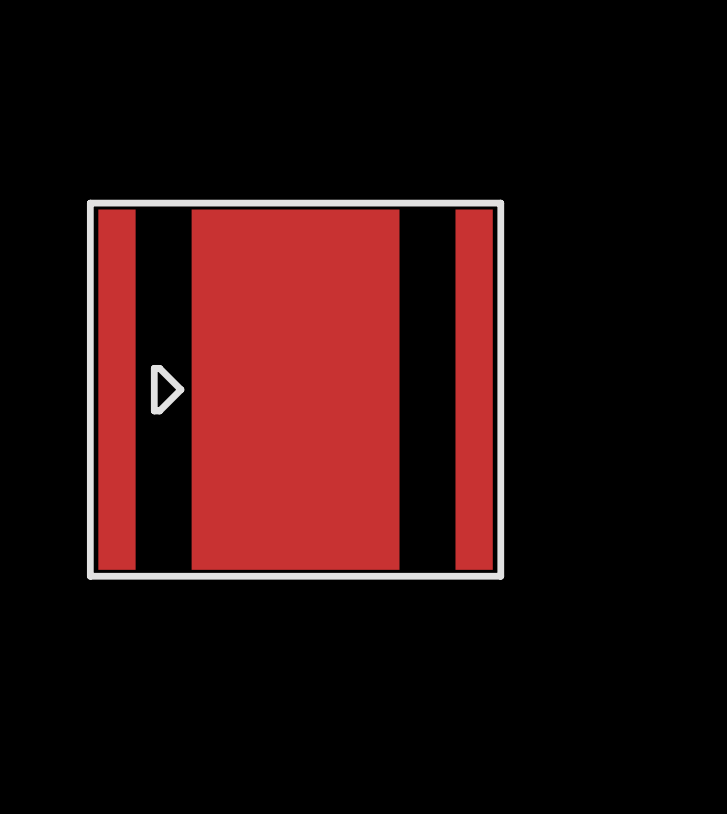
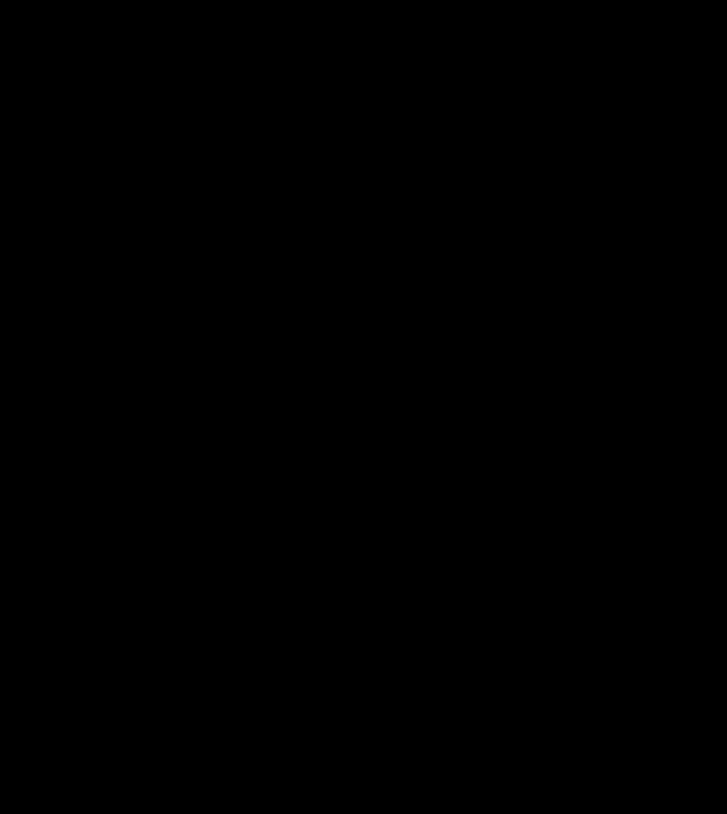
part: (295, 389) -> none

